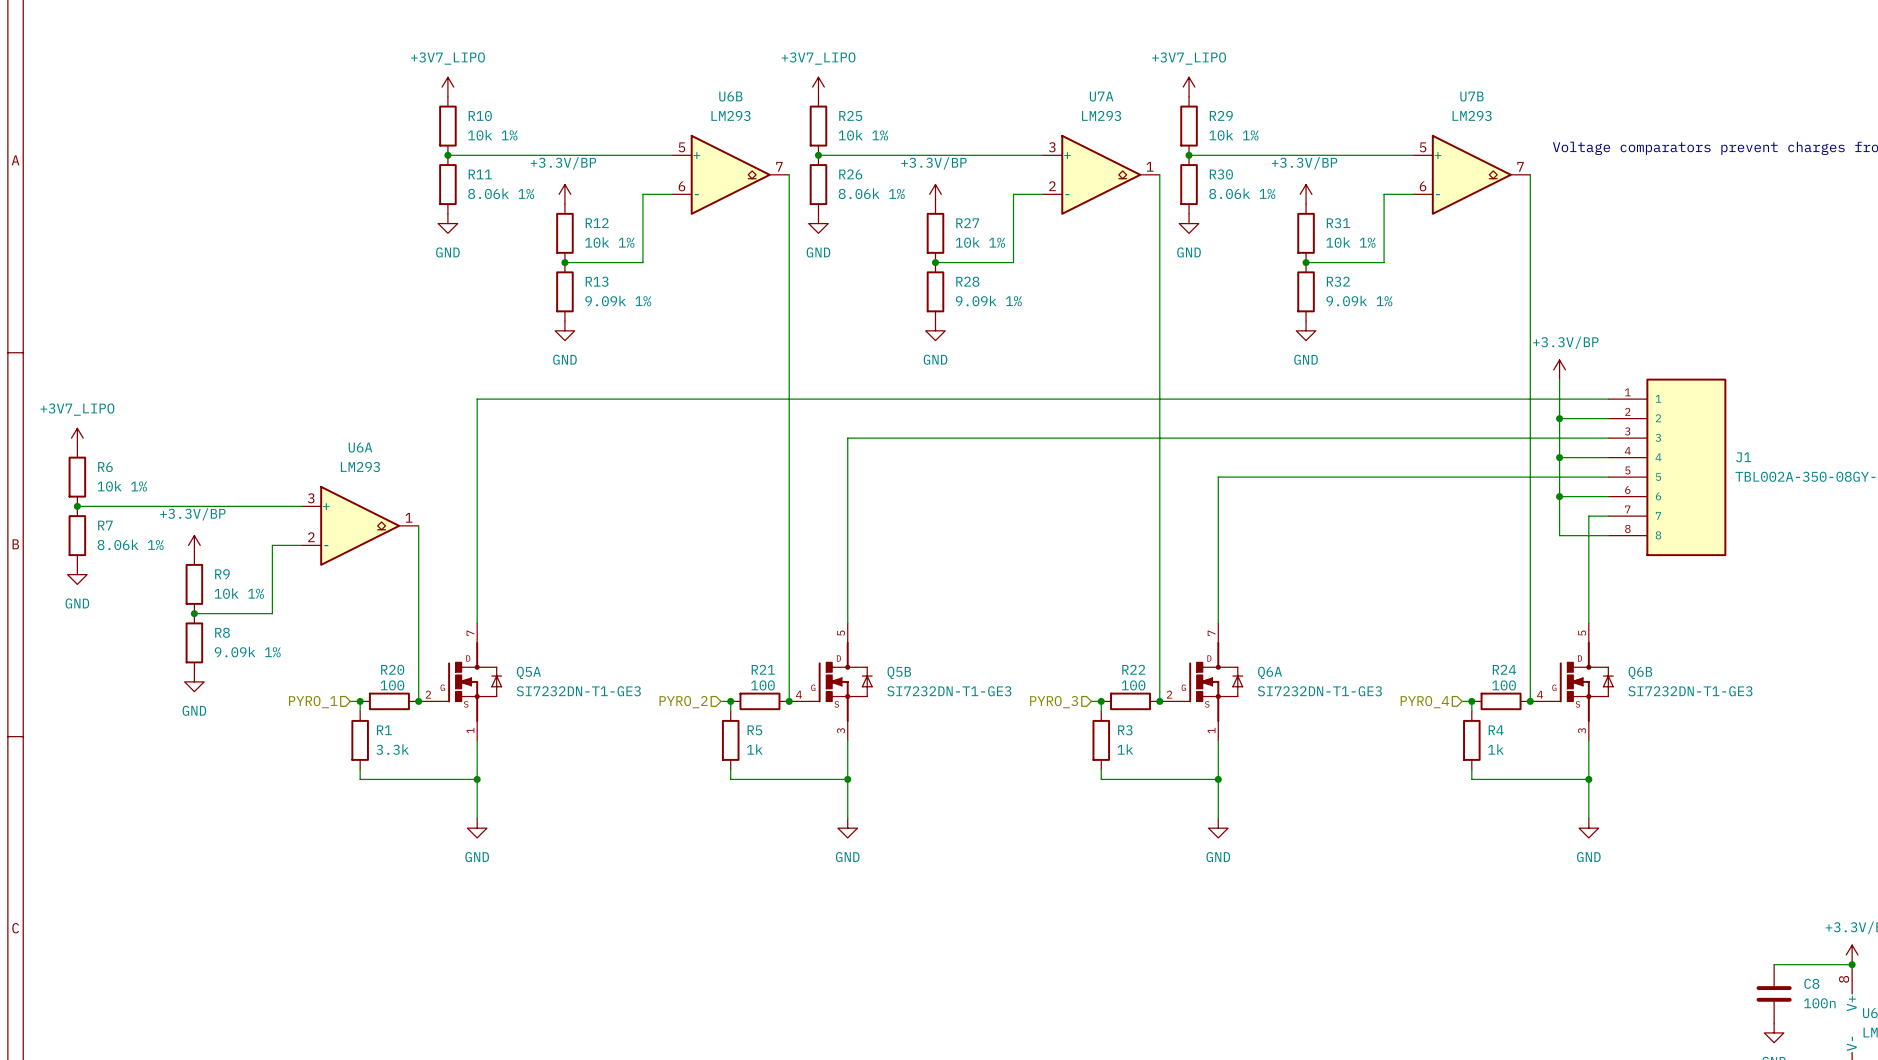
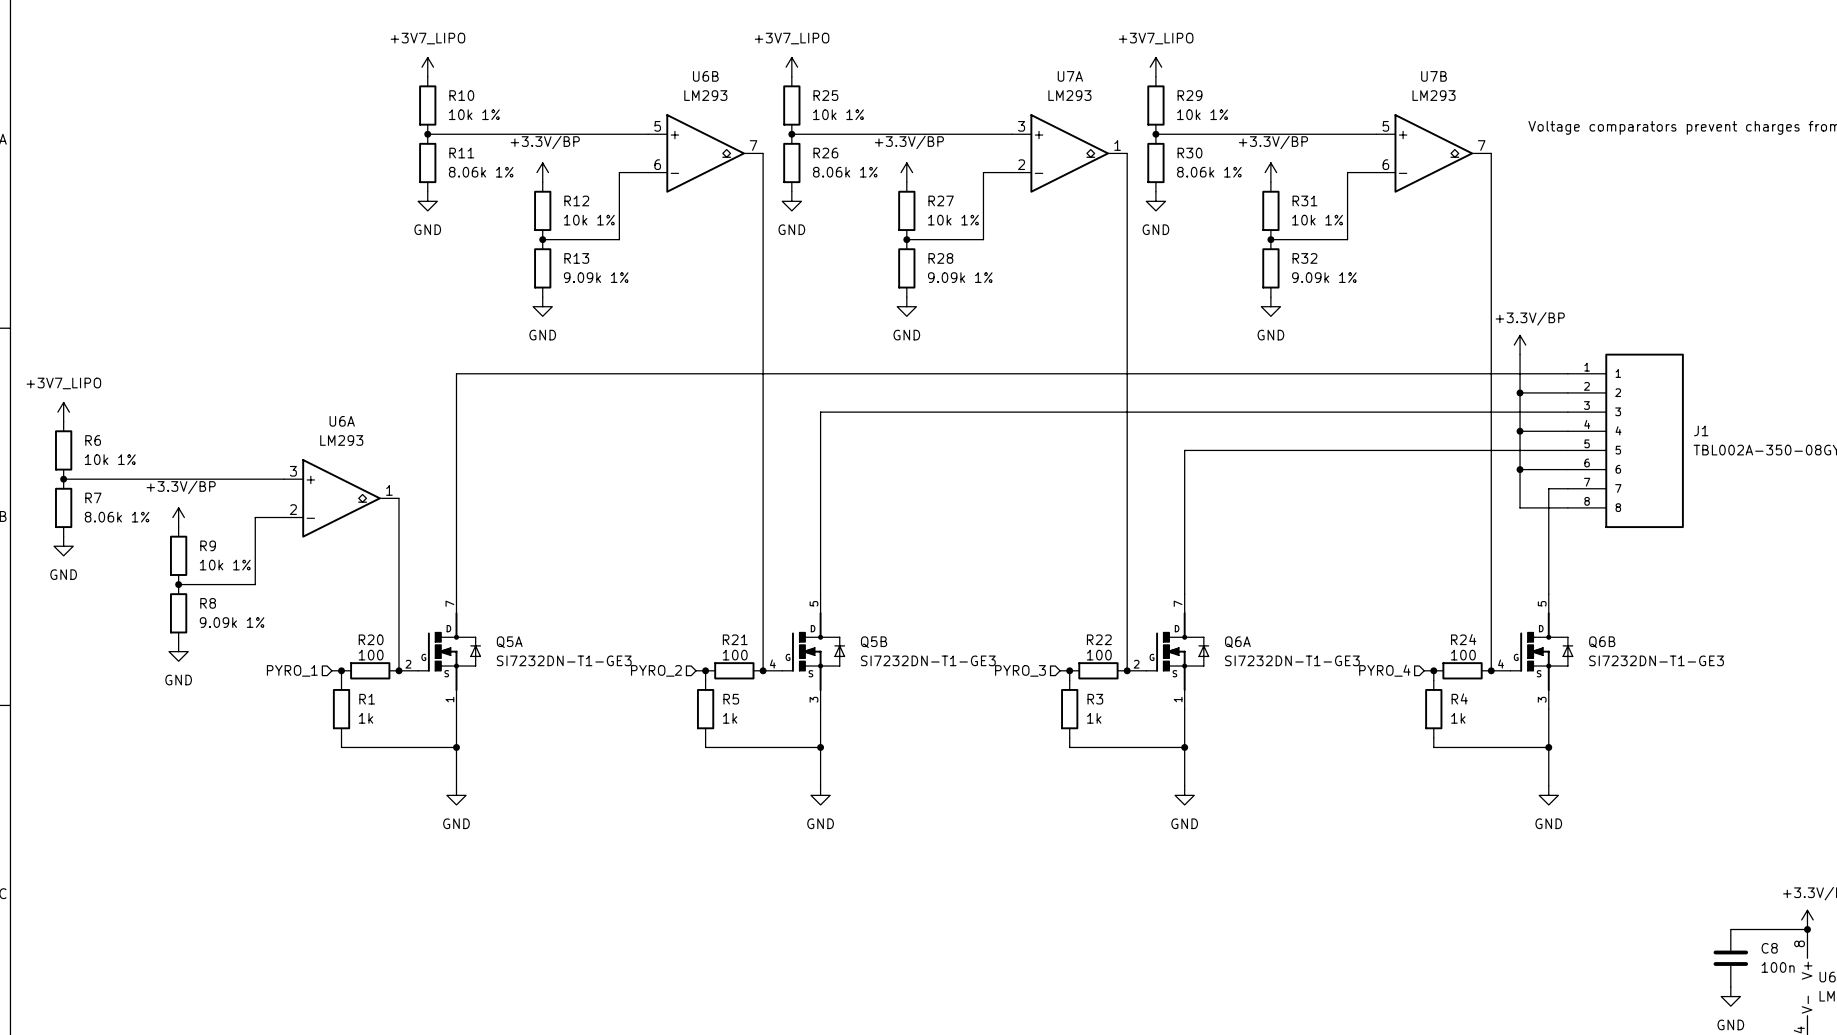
R1 value: 3.3k (392, 749) -> 1k (366, 718)

